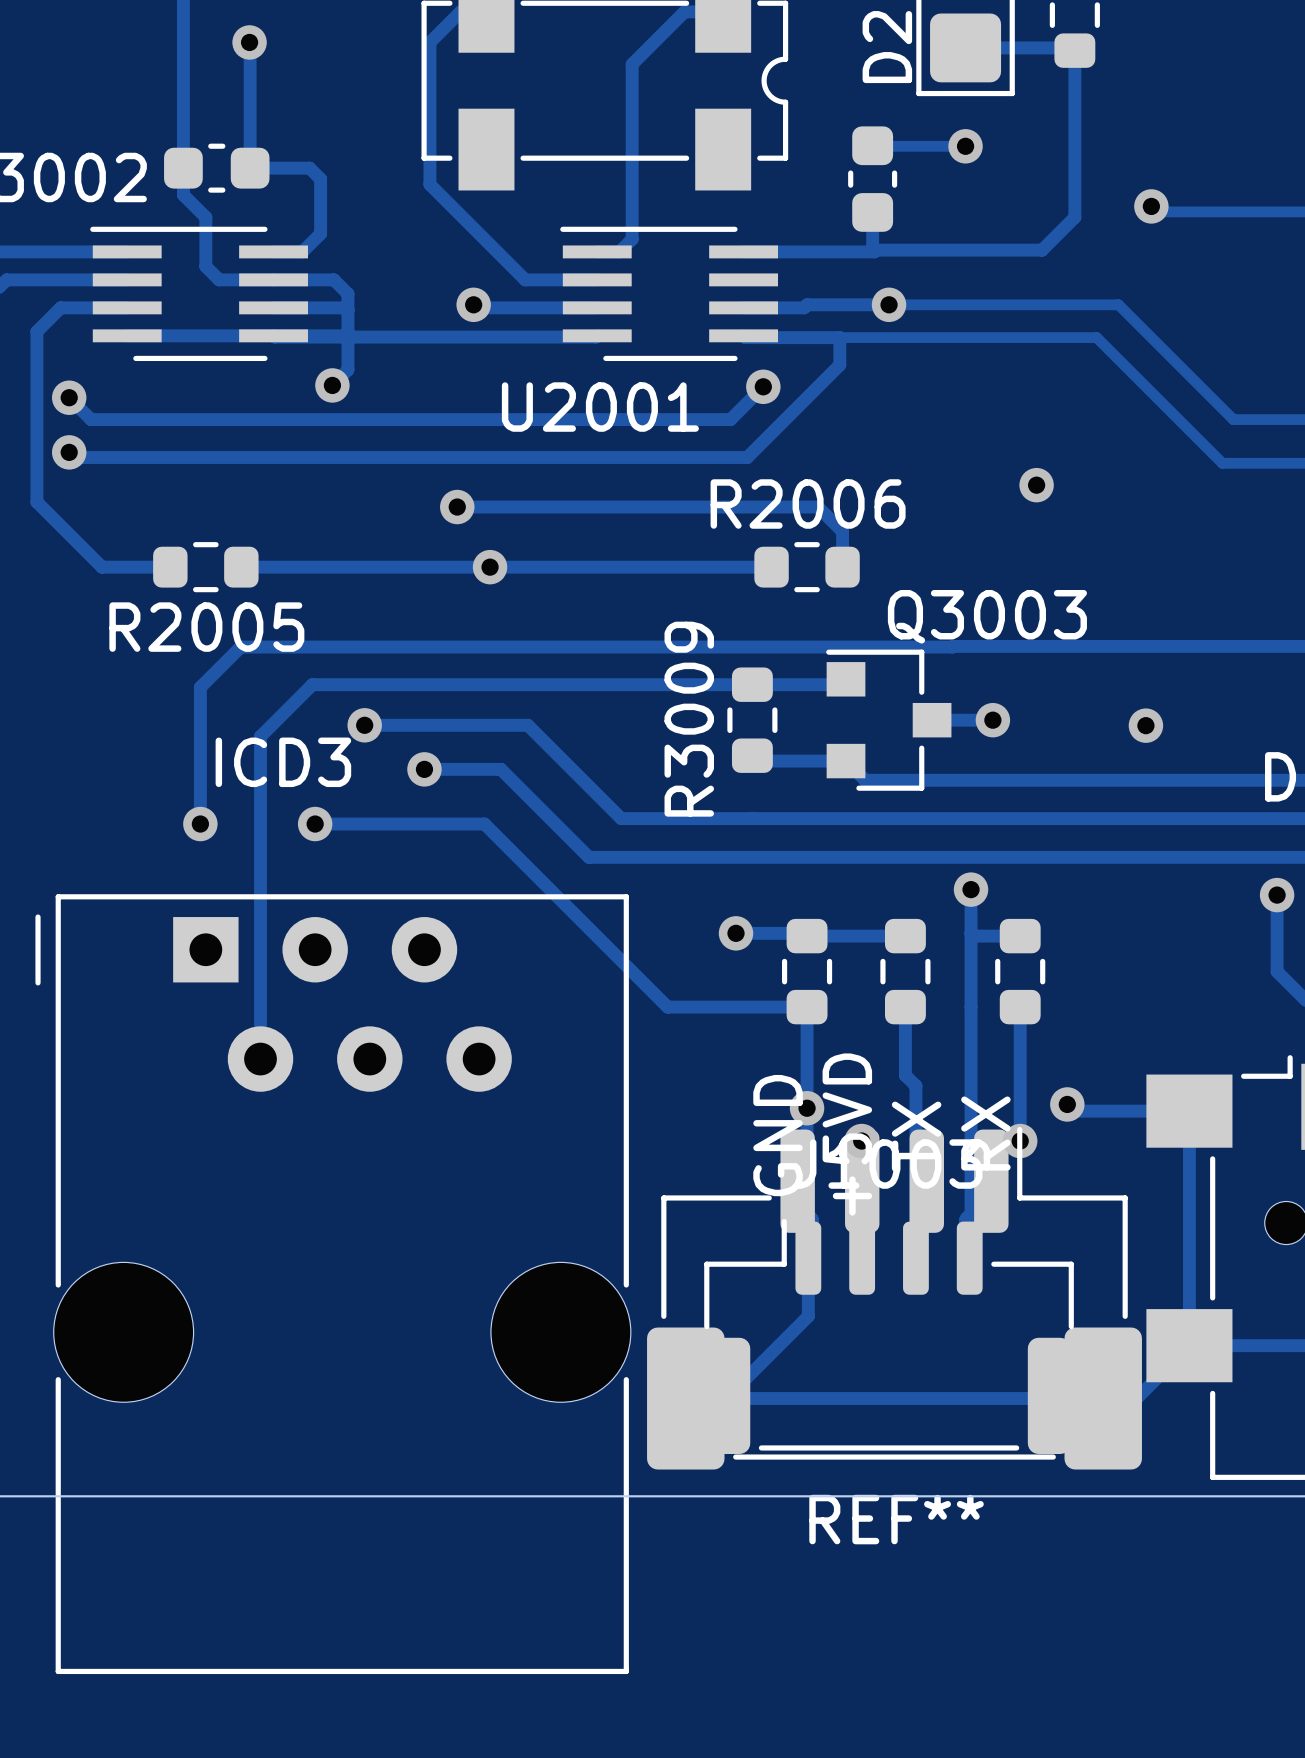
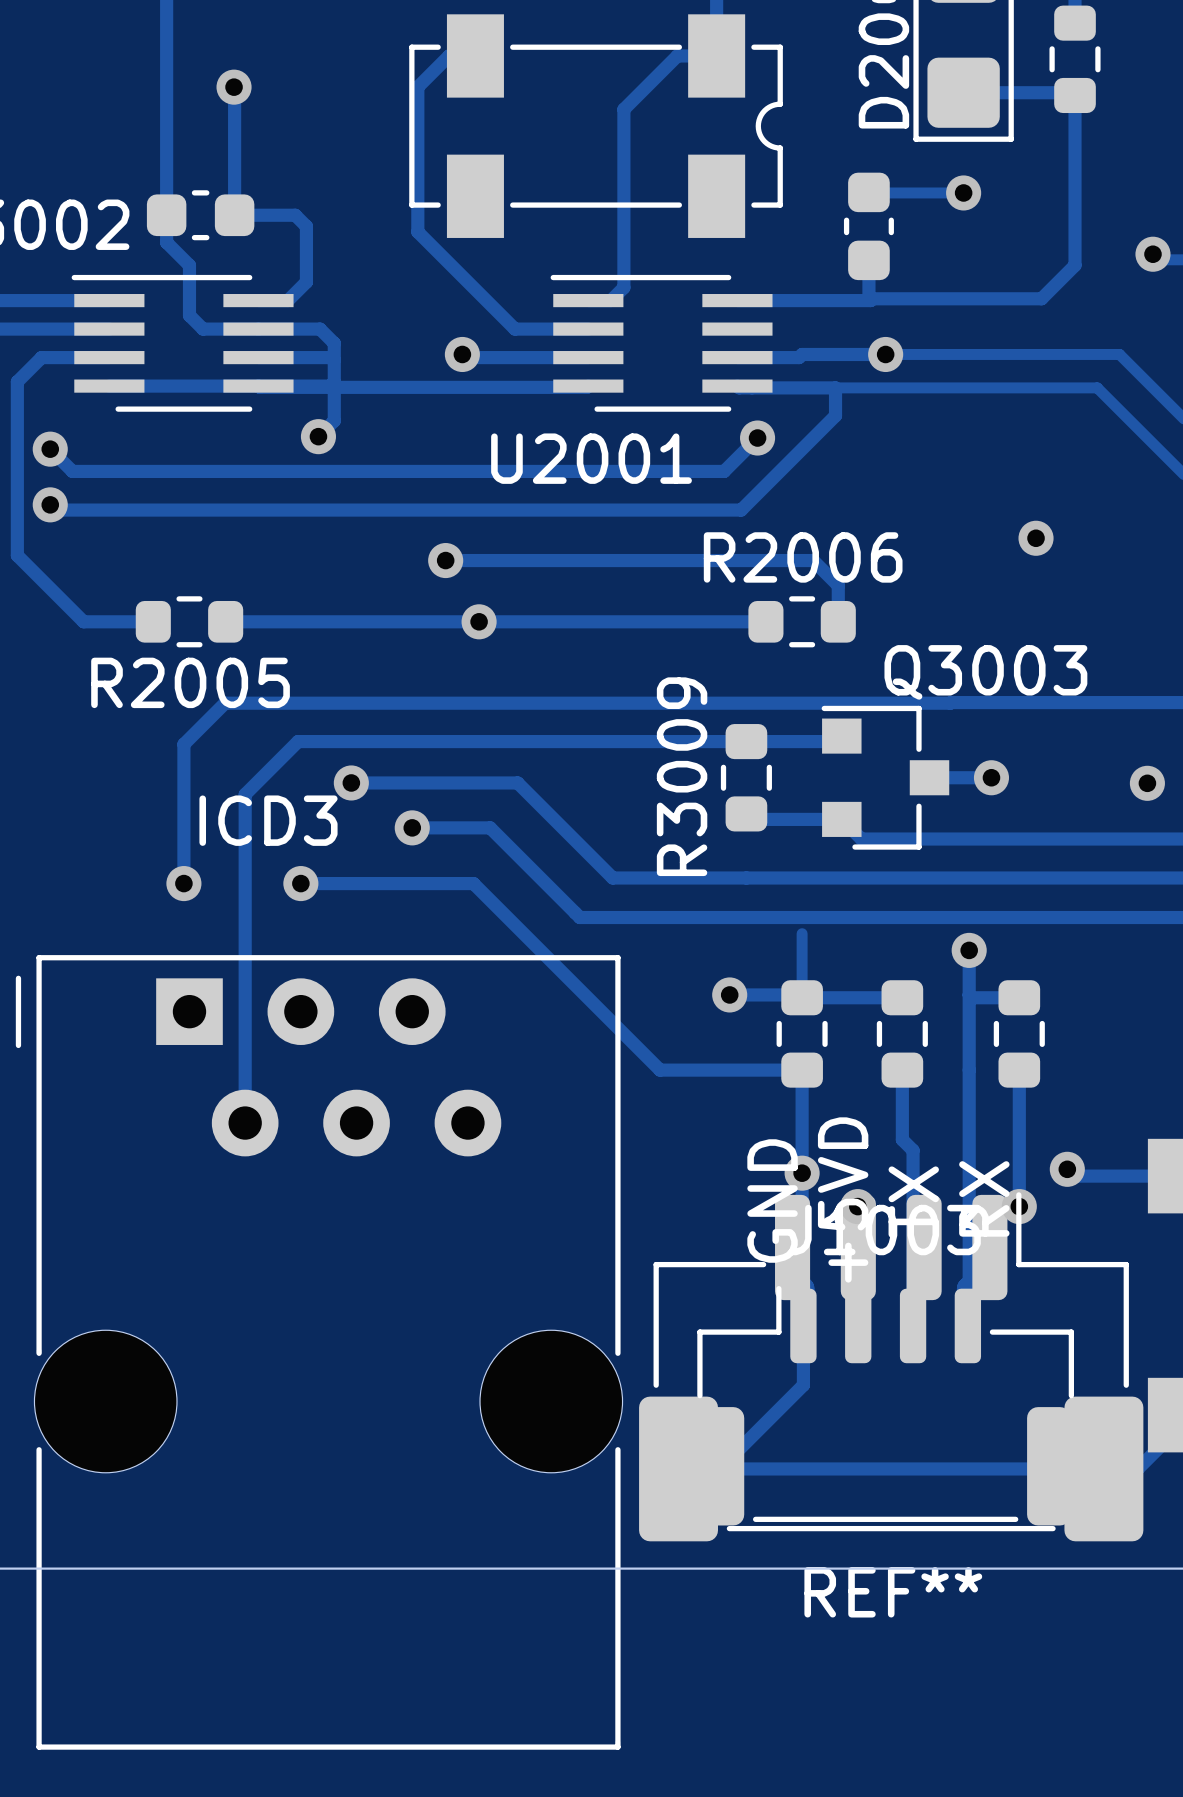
track: none -> (802, 933) (802, 997)

